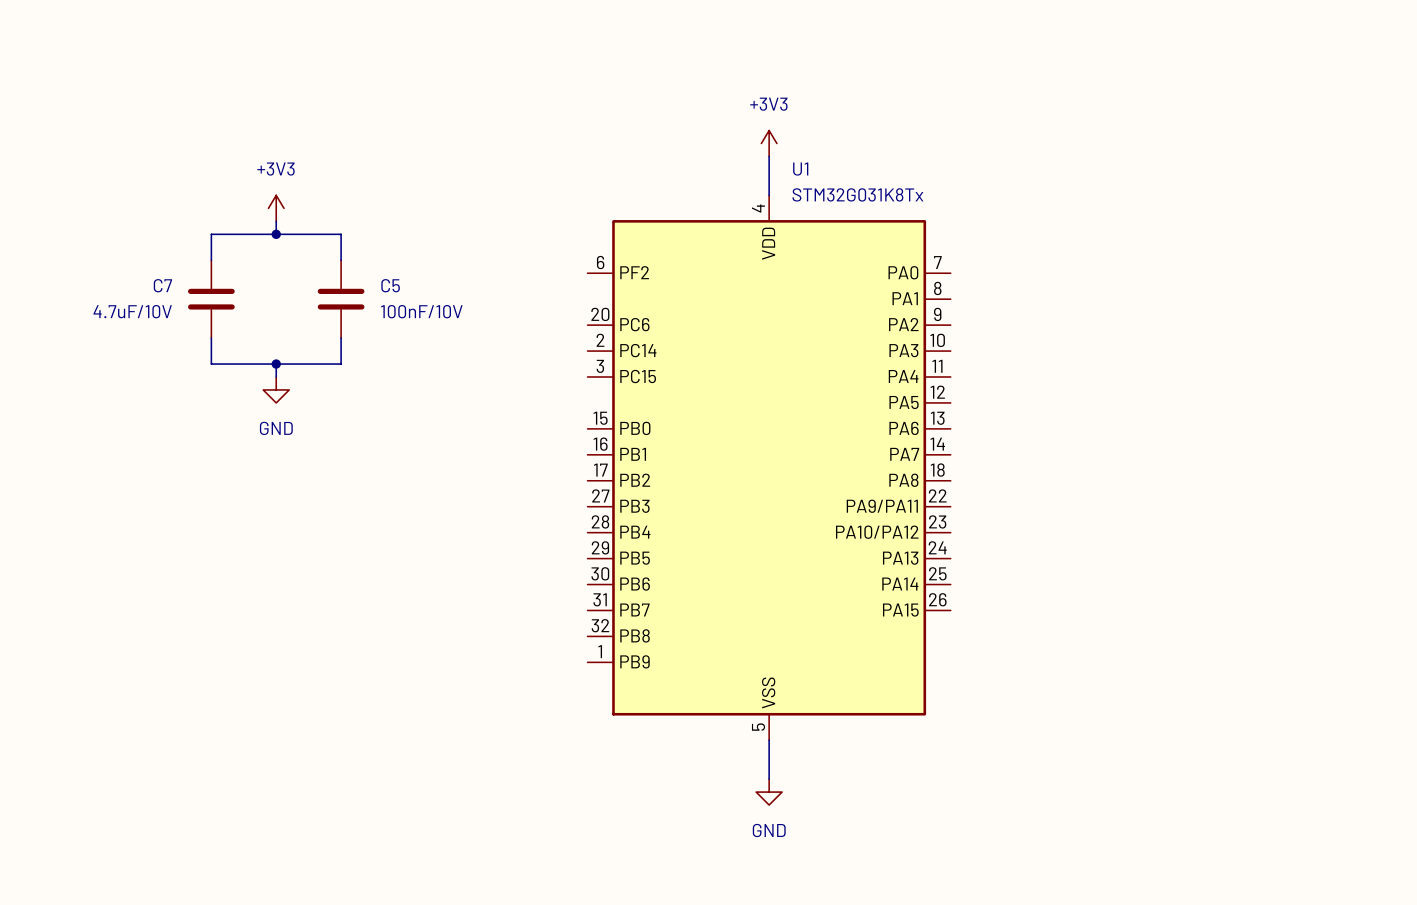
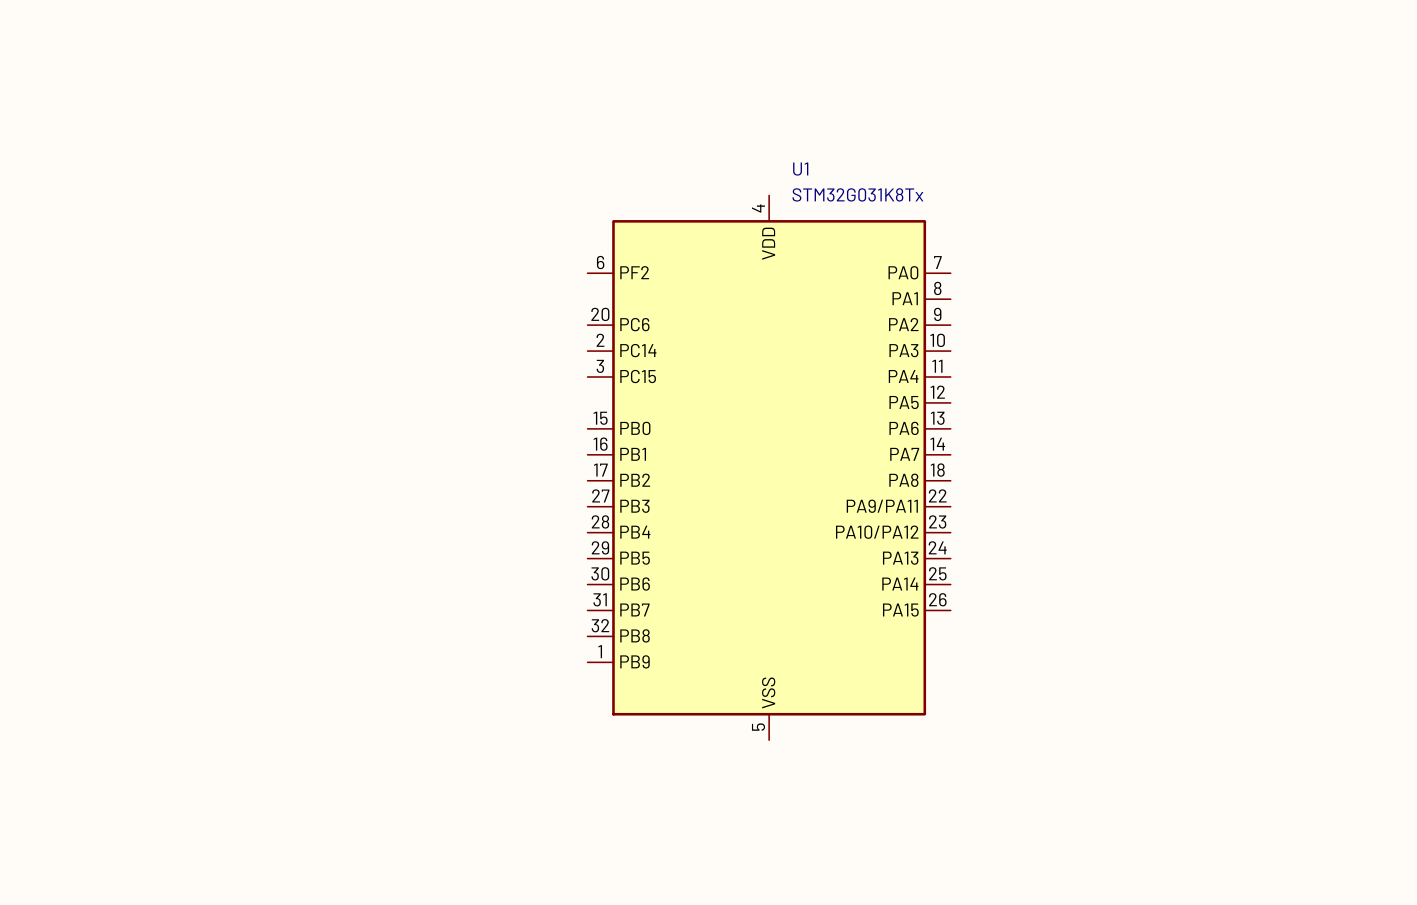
power symbol: +3V3 (769, 143) -> none
wire: (769, 156) (769, 195) -> none
power symbol: +3V3 (276, 208) -> none
wire: (276, 221) (276, 234) -> none
junction: (276, 234) -> none
wire: (211, 260) (211, 234) (341, 234) (341, 260) -> none
C7: 4.7uF/10V (211, 299) -> none
C5: 100nF/10V (341, 299) -> none
wire: (211, 338) (211, 364) (341, 364) (341, 338) -> none
wire: (276, 364) (276, 377) -> none
junction: (276, 364) -> none
power symbol: GND (276, 389) -> none
wire: (769, 740) (769, 779) -> none
power symbol: GND (769, 792) -> none

